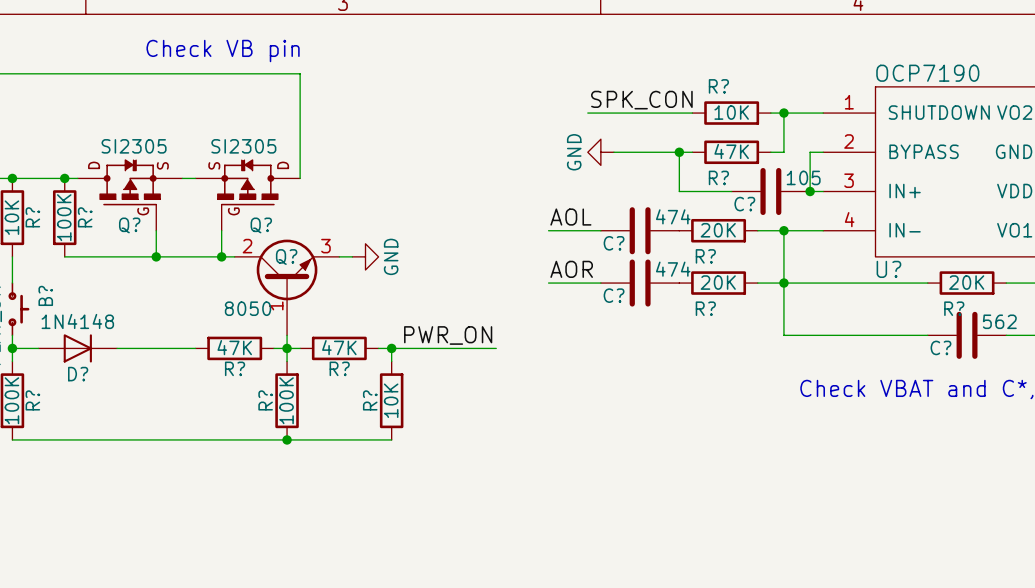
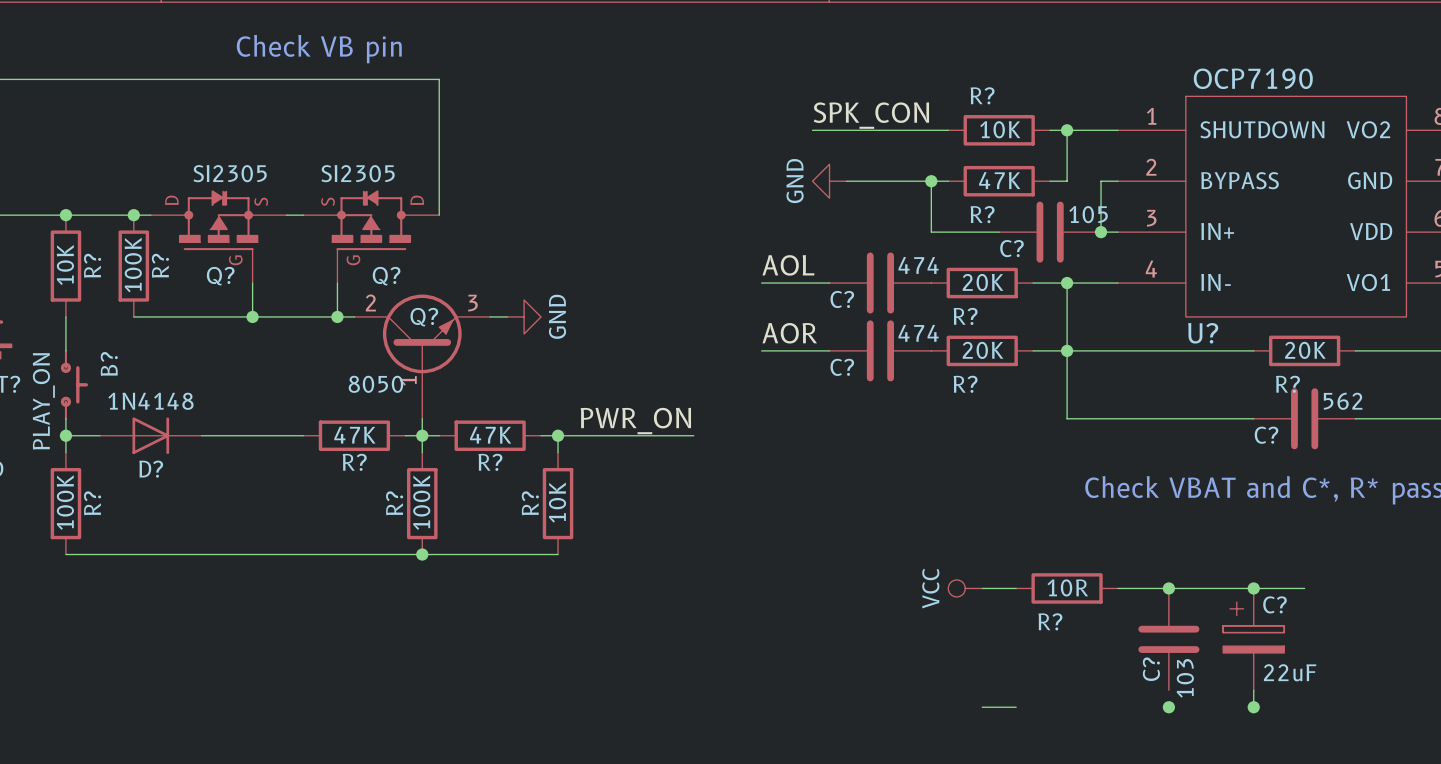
power symbol: none -> VCC (965, 588)
wire: none -> (982, 588) (1016, 588)
R?: none -> 10R (1067, 588)
wire: none -> (1117, 588) (1304, 588)
junction: none -> (1168, 588)
junction: none -> (1253, 588)
C?: none -> 103 (1168, 639)
C?: none -> 22uF (1253, 639)
wire: none -> (1253, 690) (1253, 707)
wire: none -> (982, 707) (1016, 707)
junction: none -> (1168, 707)
junction: none -> (1253, 707)

